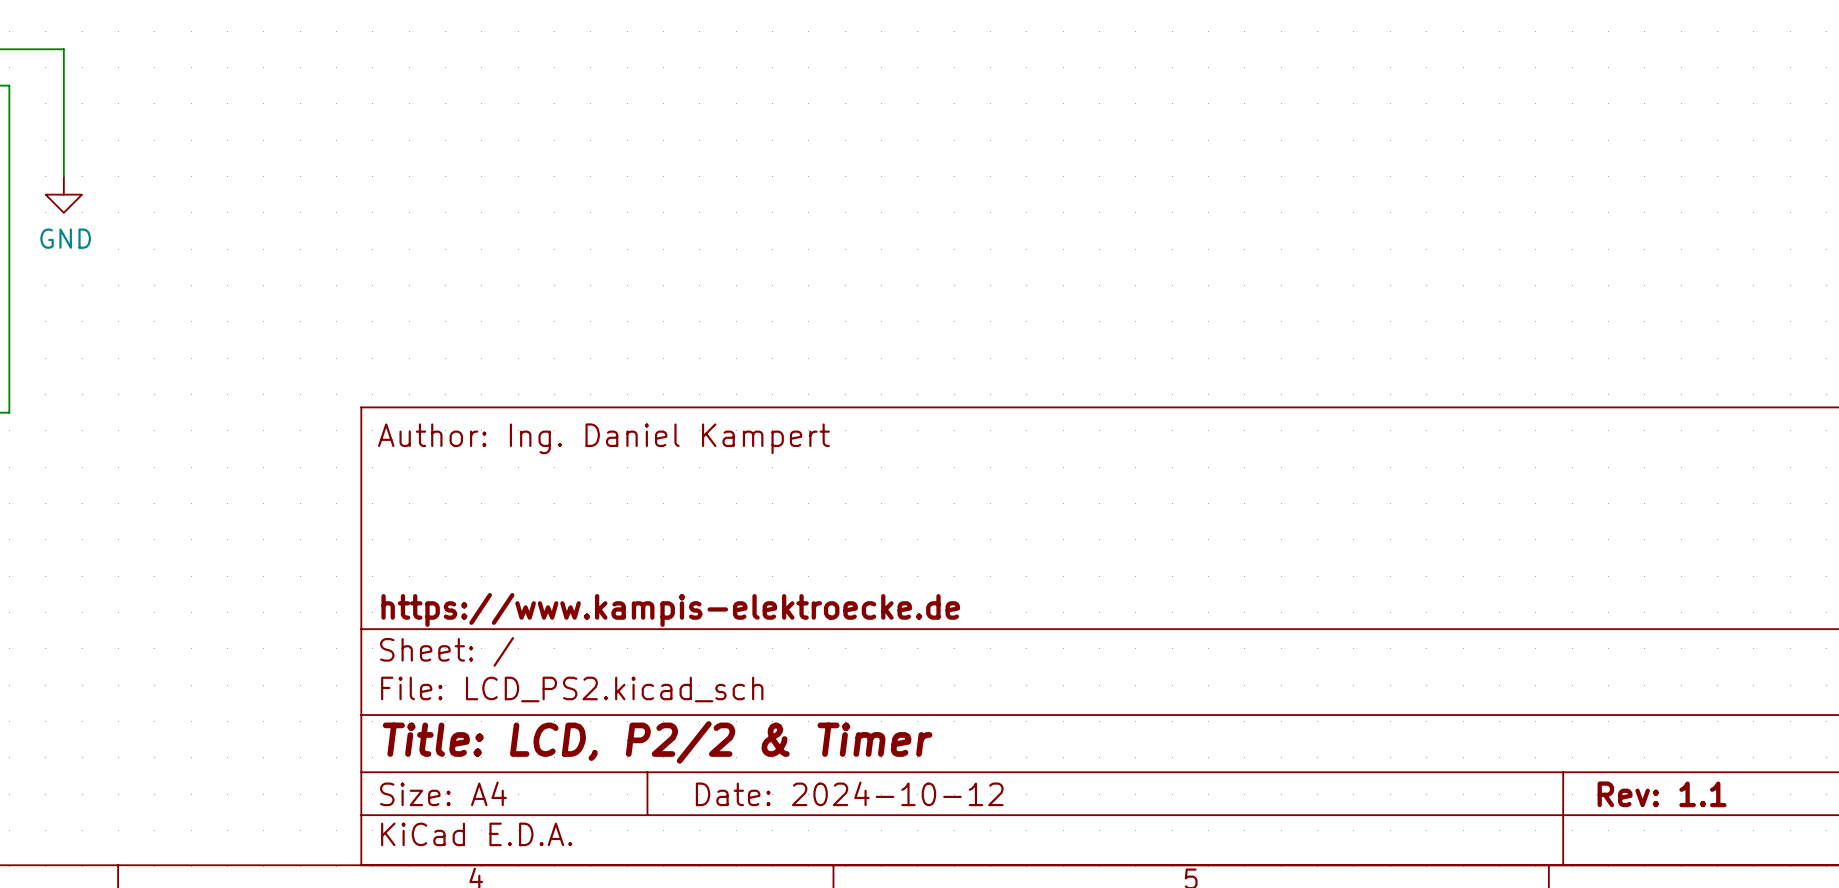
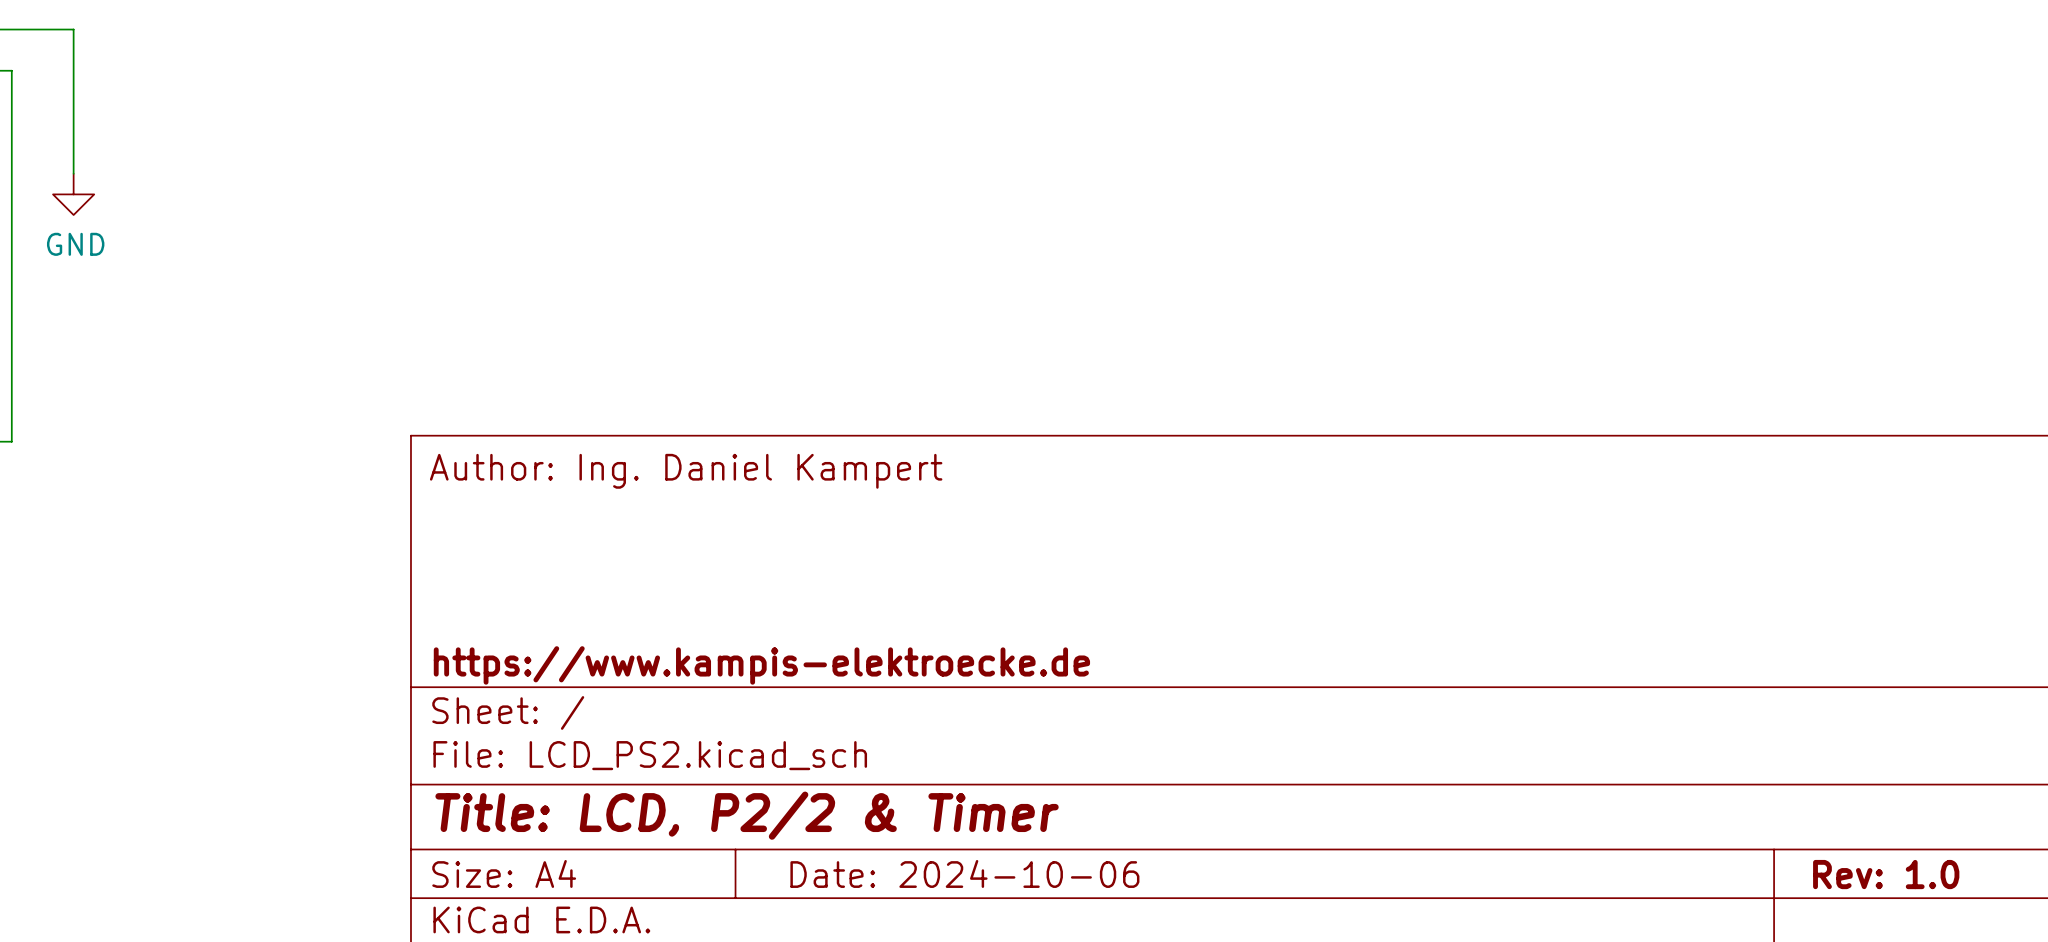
title block: Date: 2024-10-12 (849, 793) -> Date: 2024-10-06 (964, 873)
title block: Rev: 1.1 (1662, 794) -> Rev: 1.0 (1886, 874)

